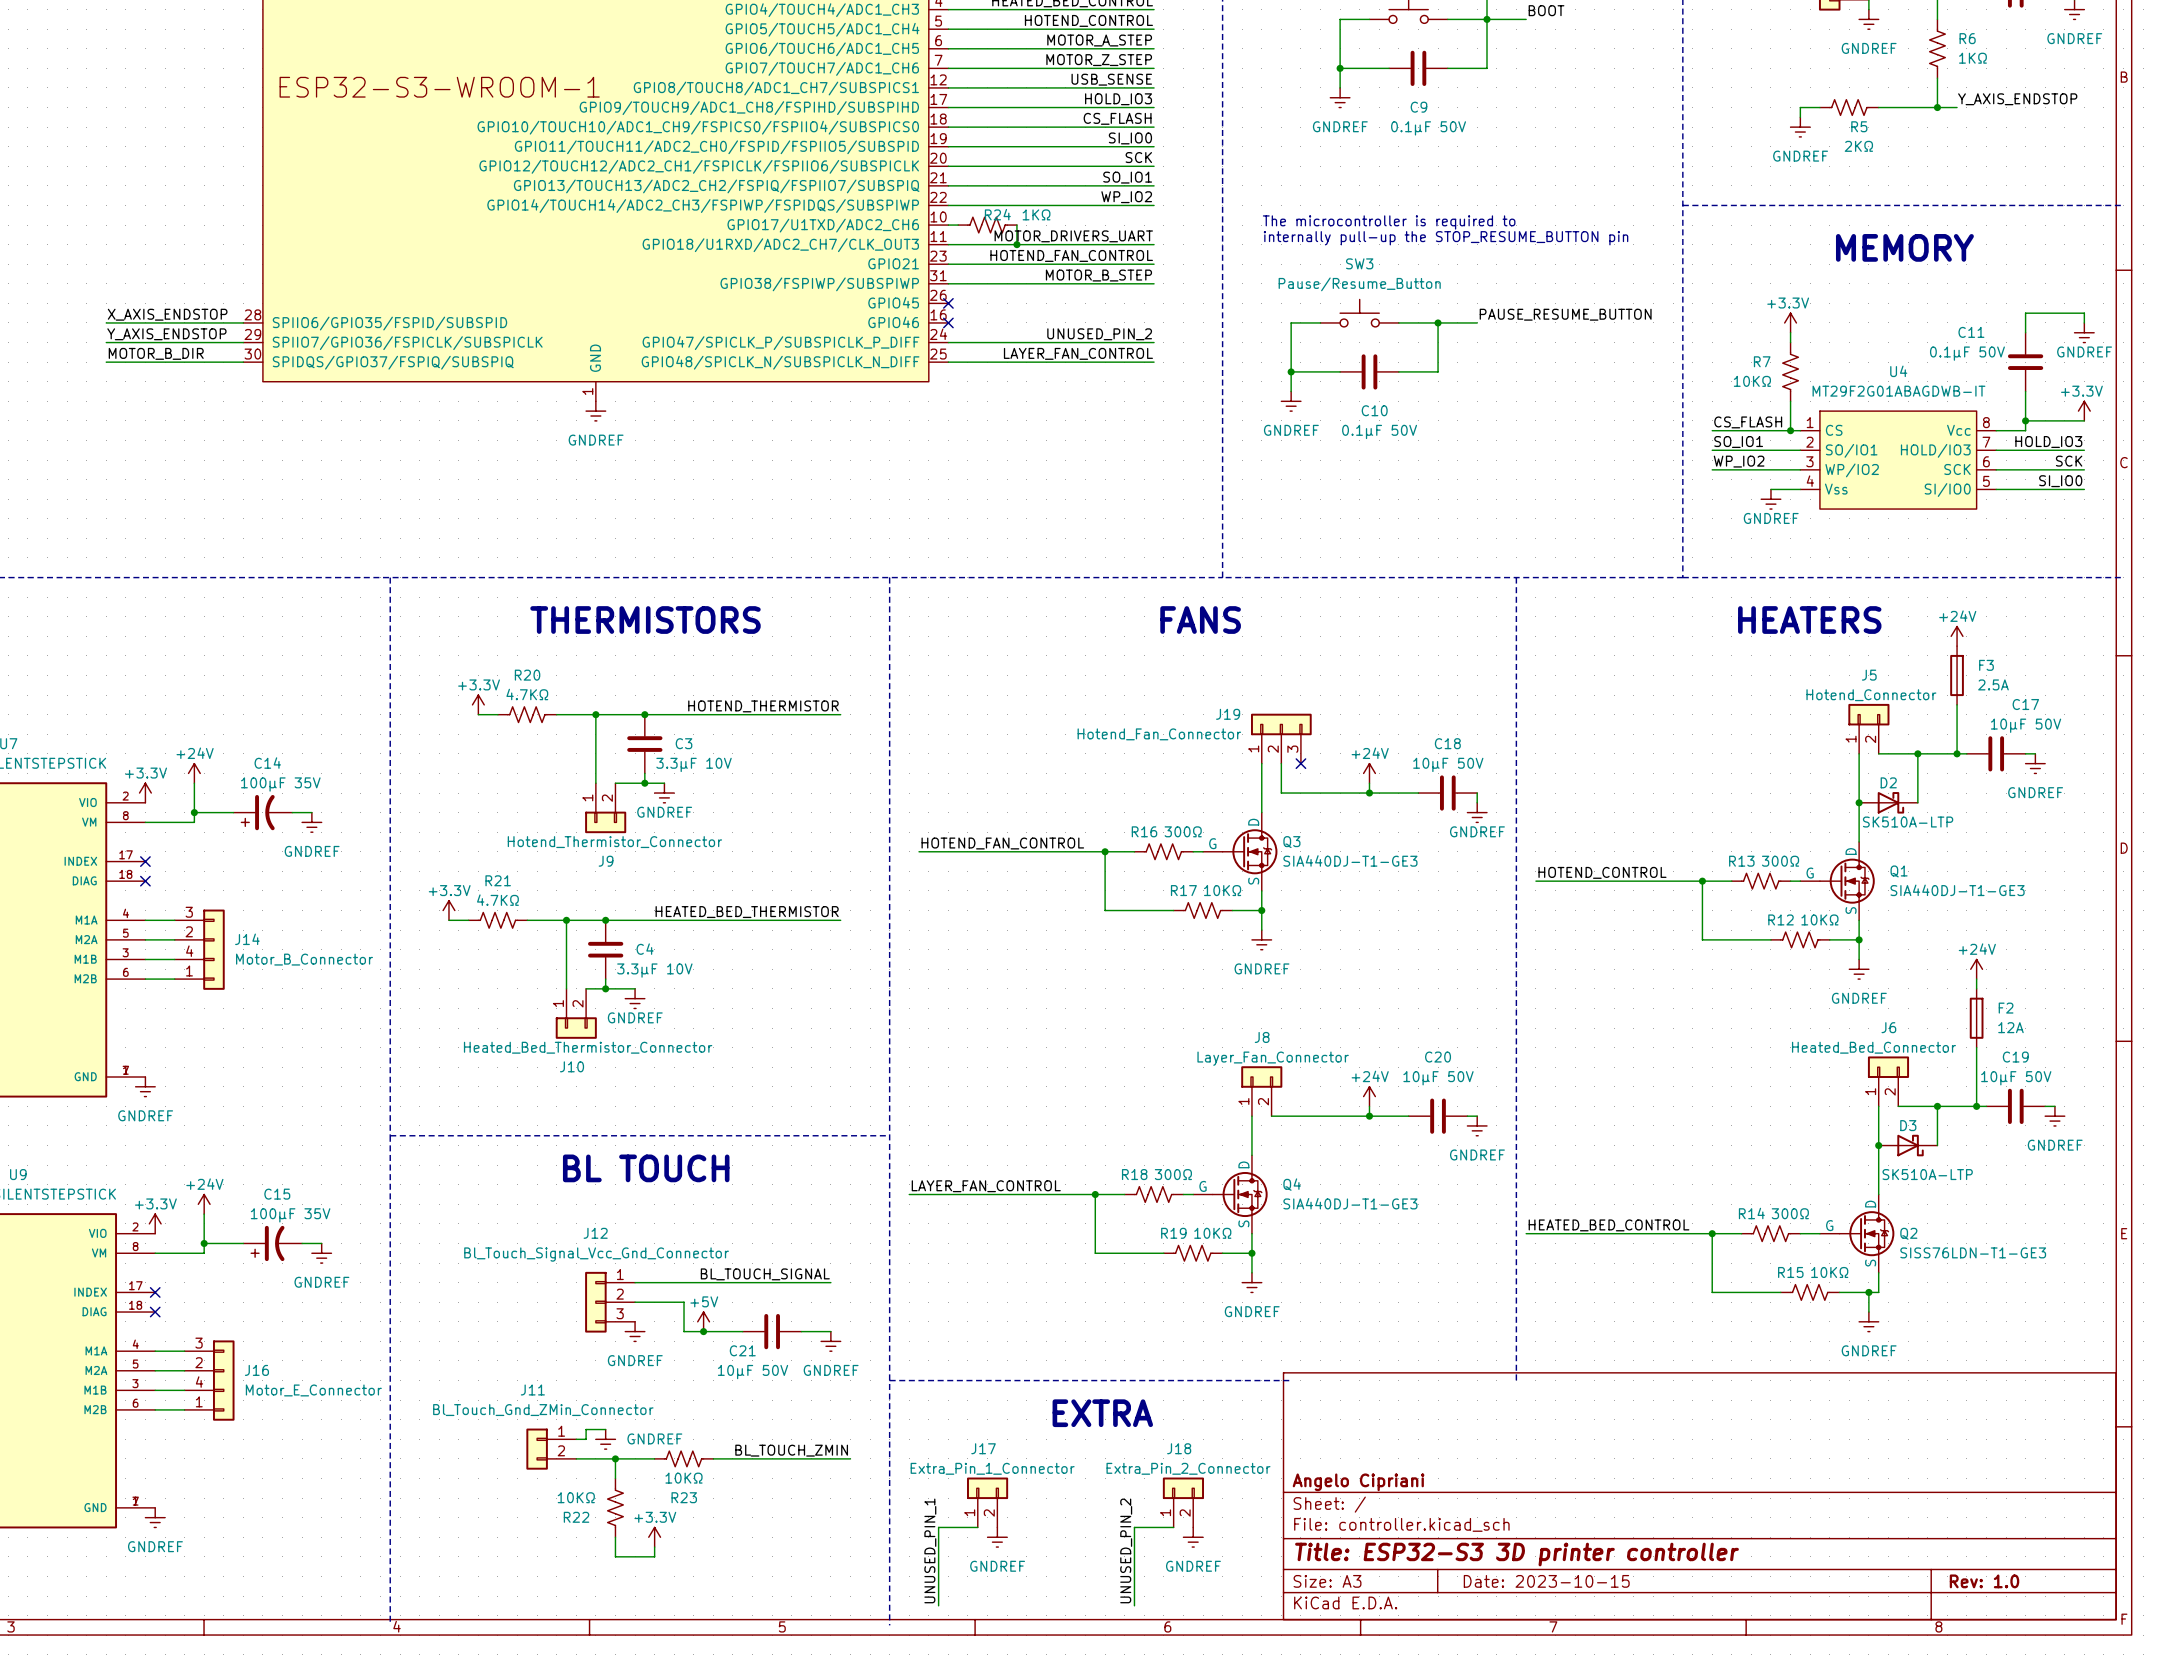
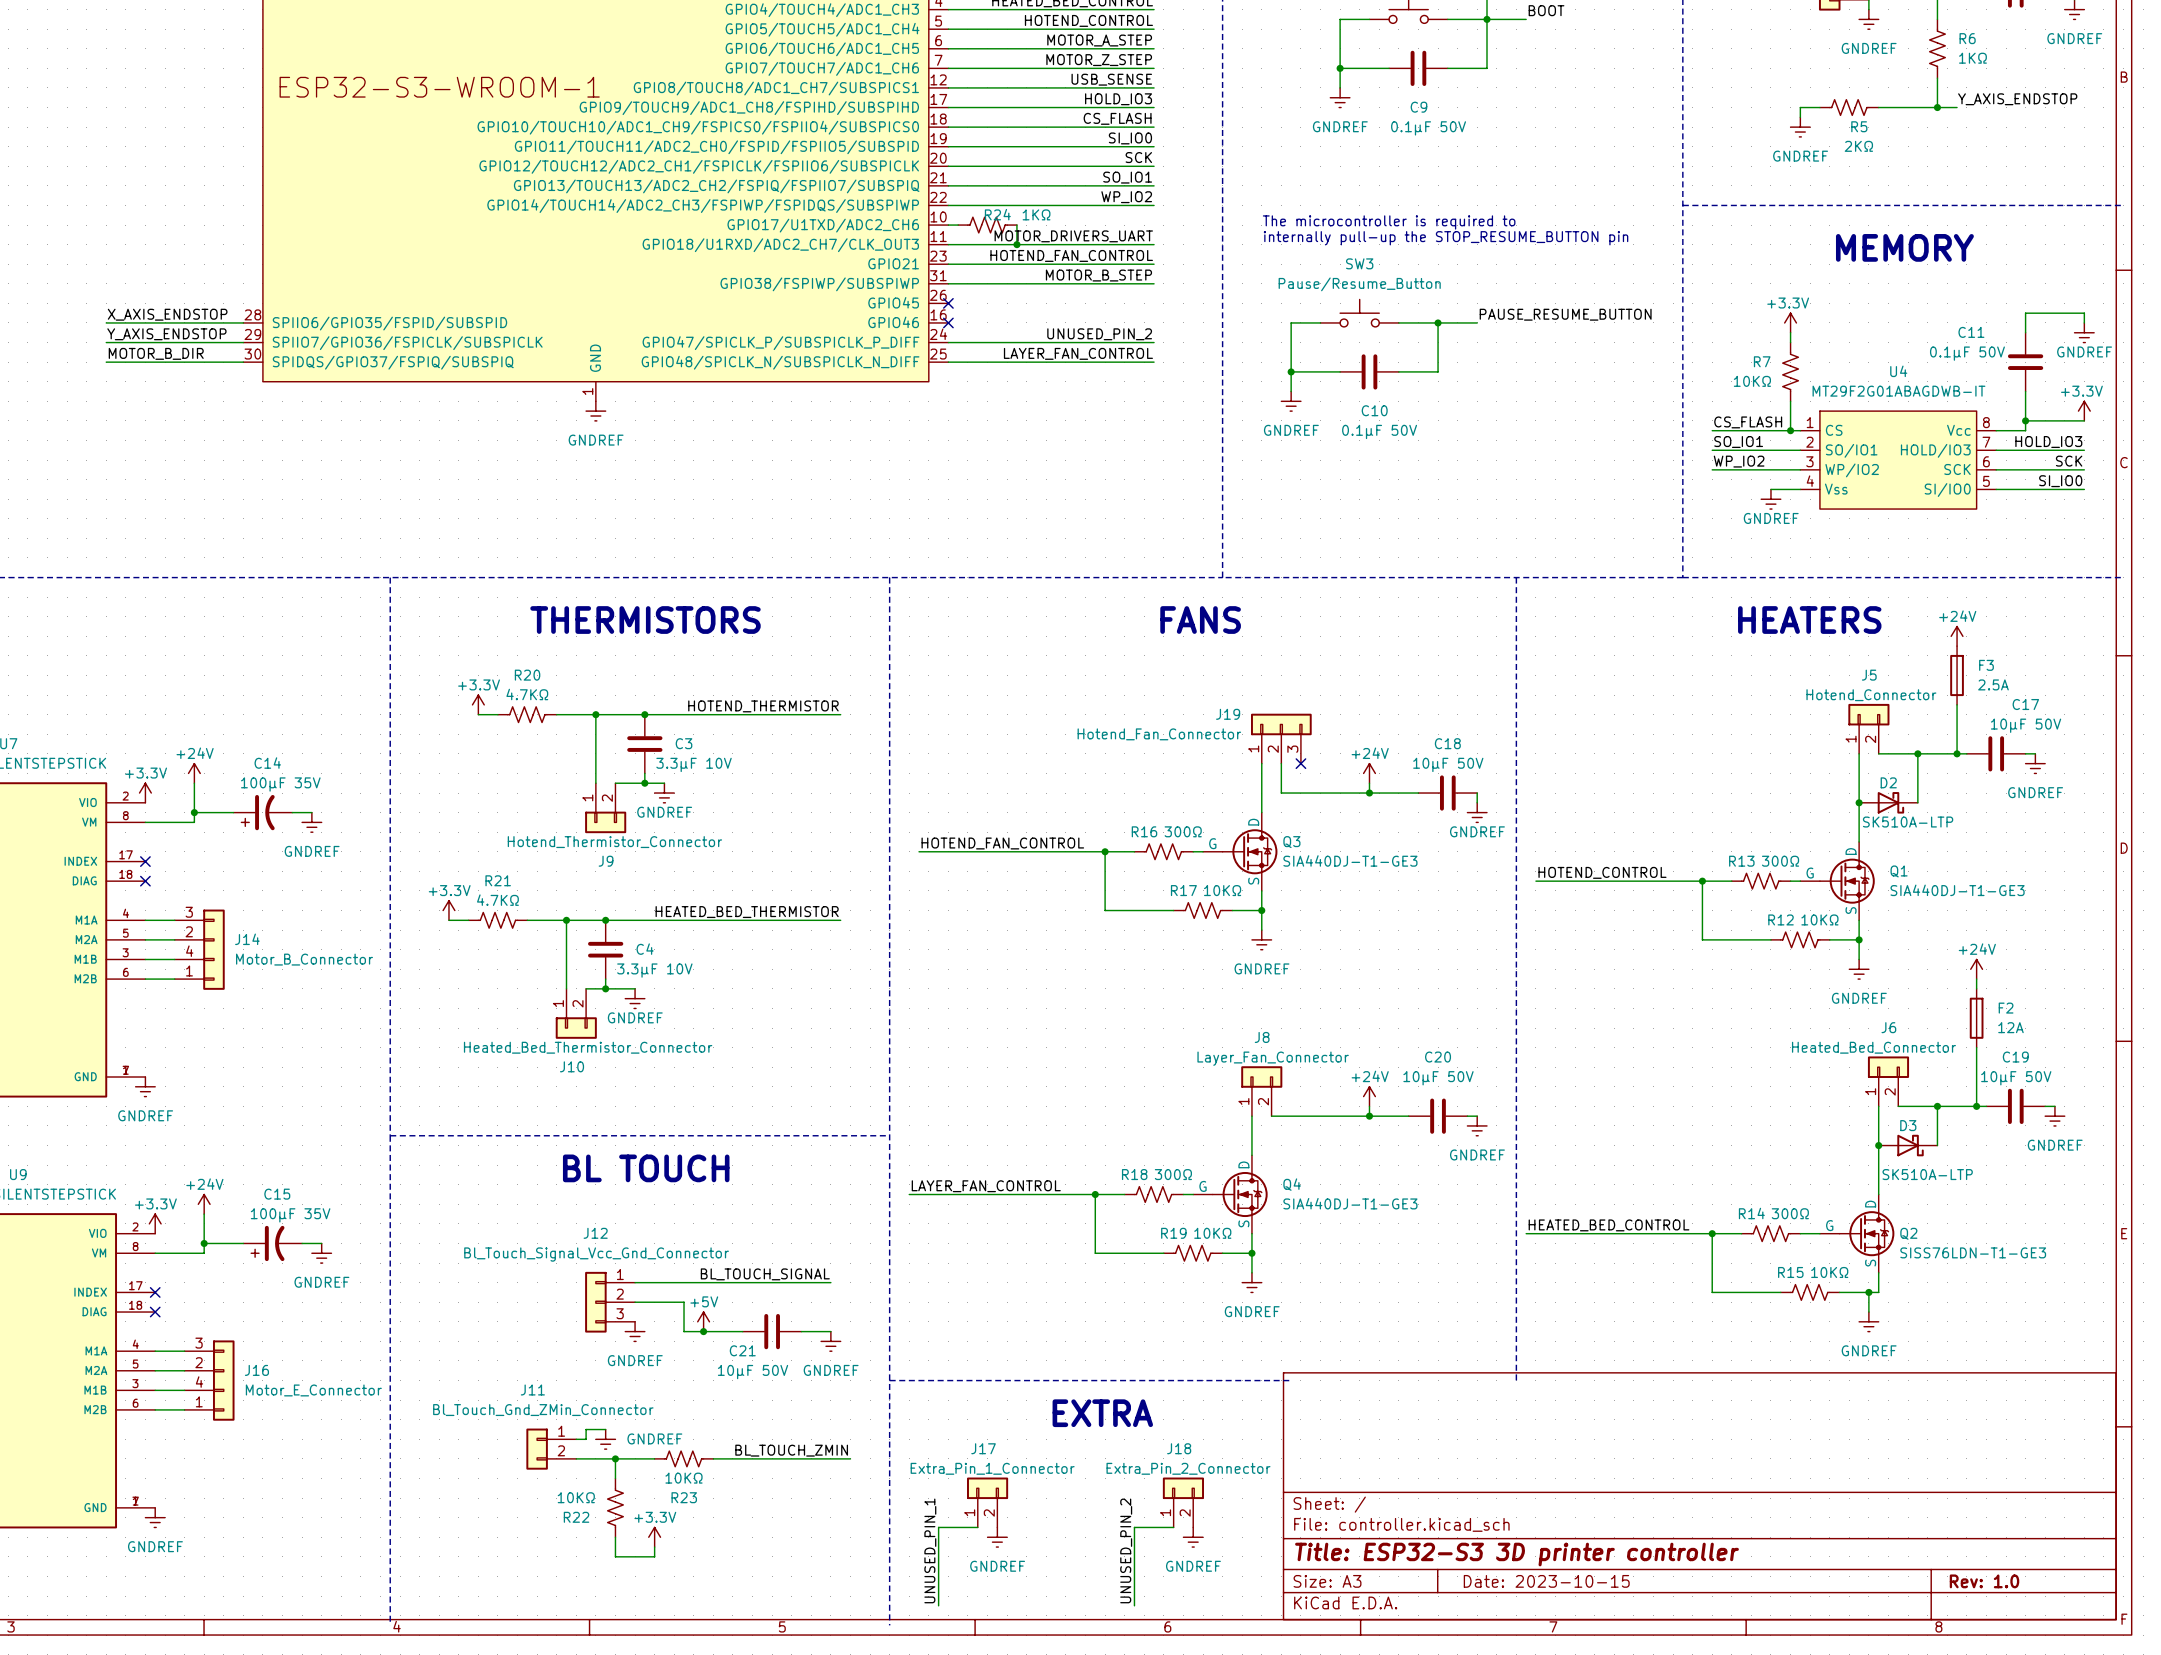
title block: Angelo Cipriani (1358, 1482) -> none

